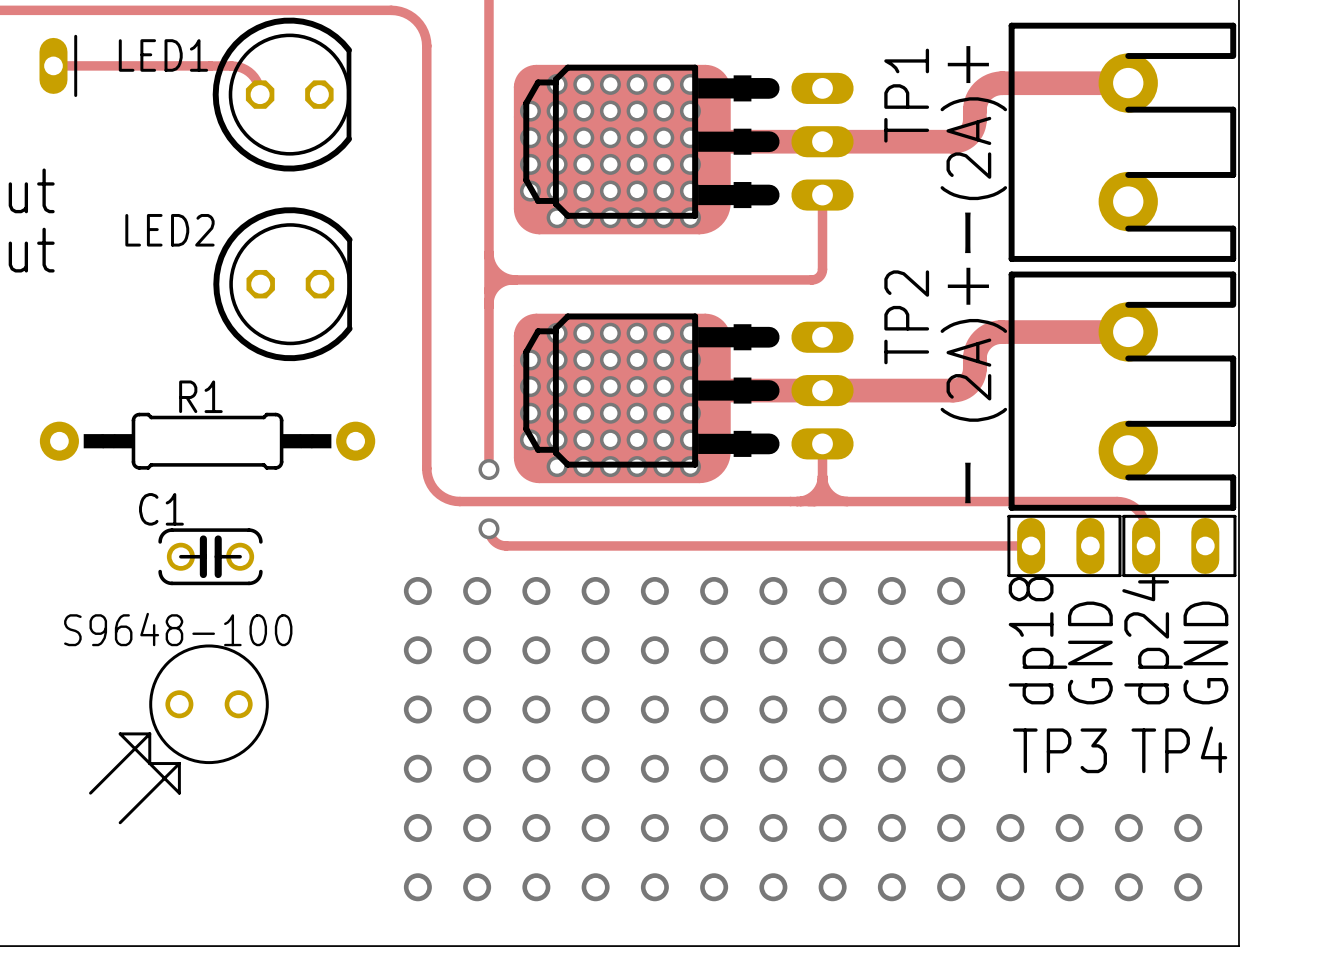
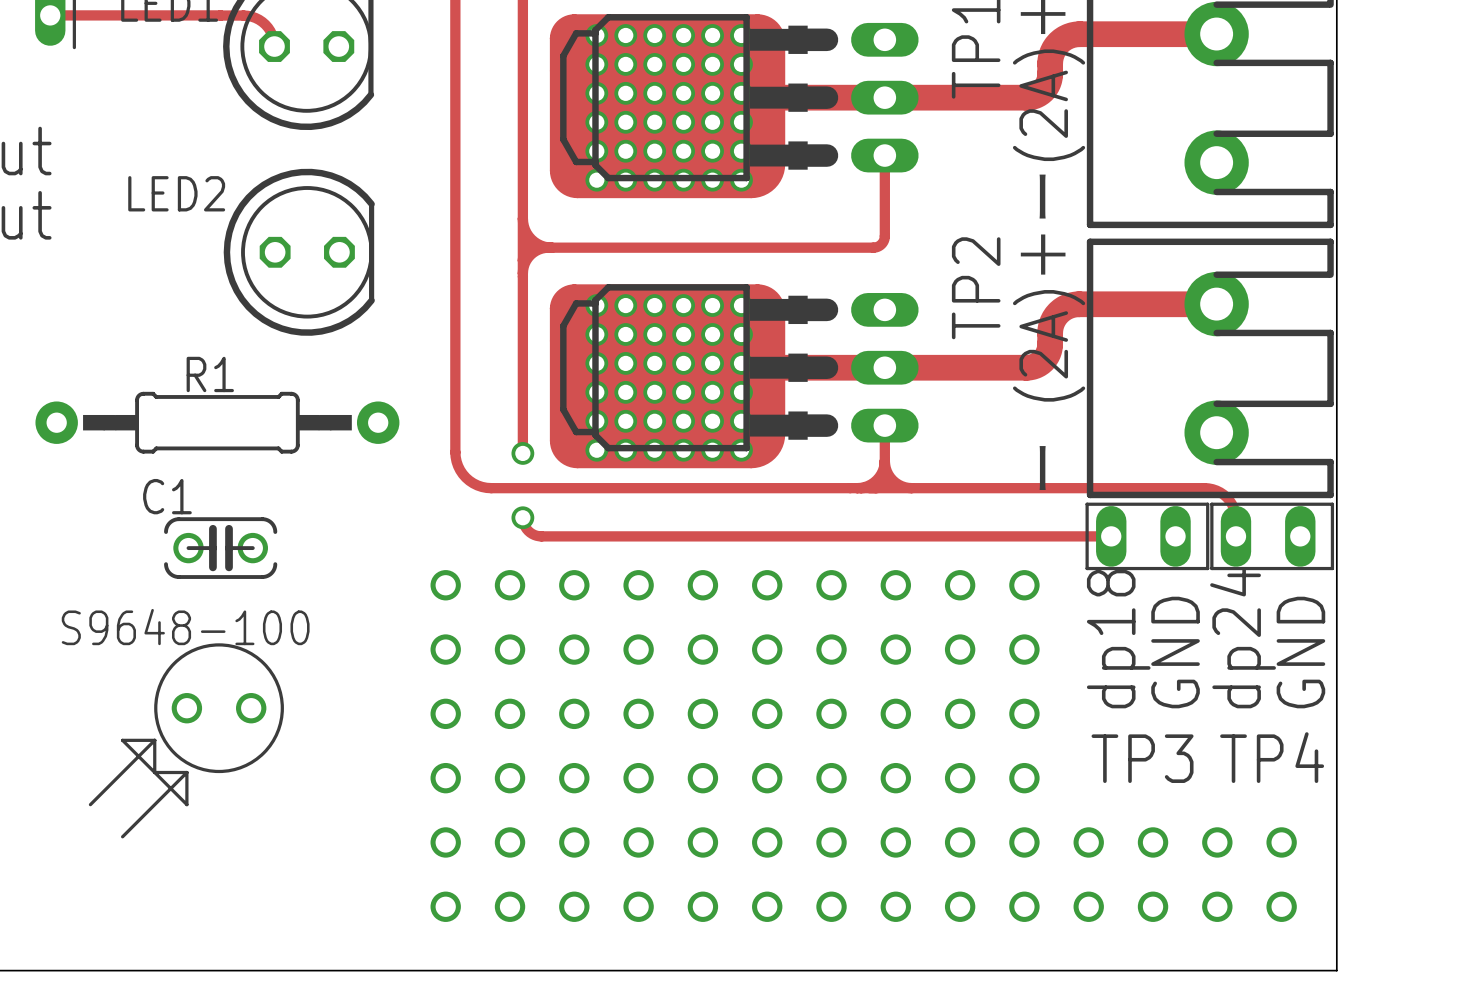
via: (530, 111) -> none
via: (530, 137) -> none
via: (530, 164) -> none
via: (530, 191) -> none
via: (530, 359) -> none
via: (530, 386) -> none
via: (530, 413) -> none
via: (530, 439) -> none

